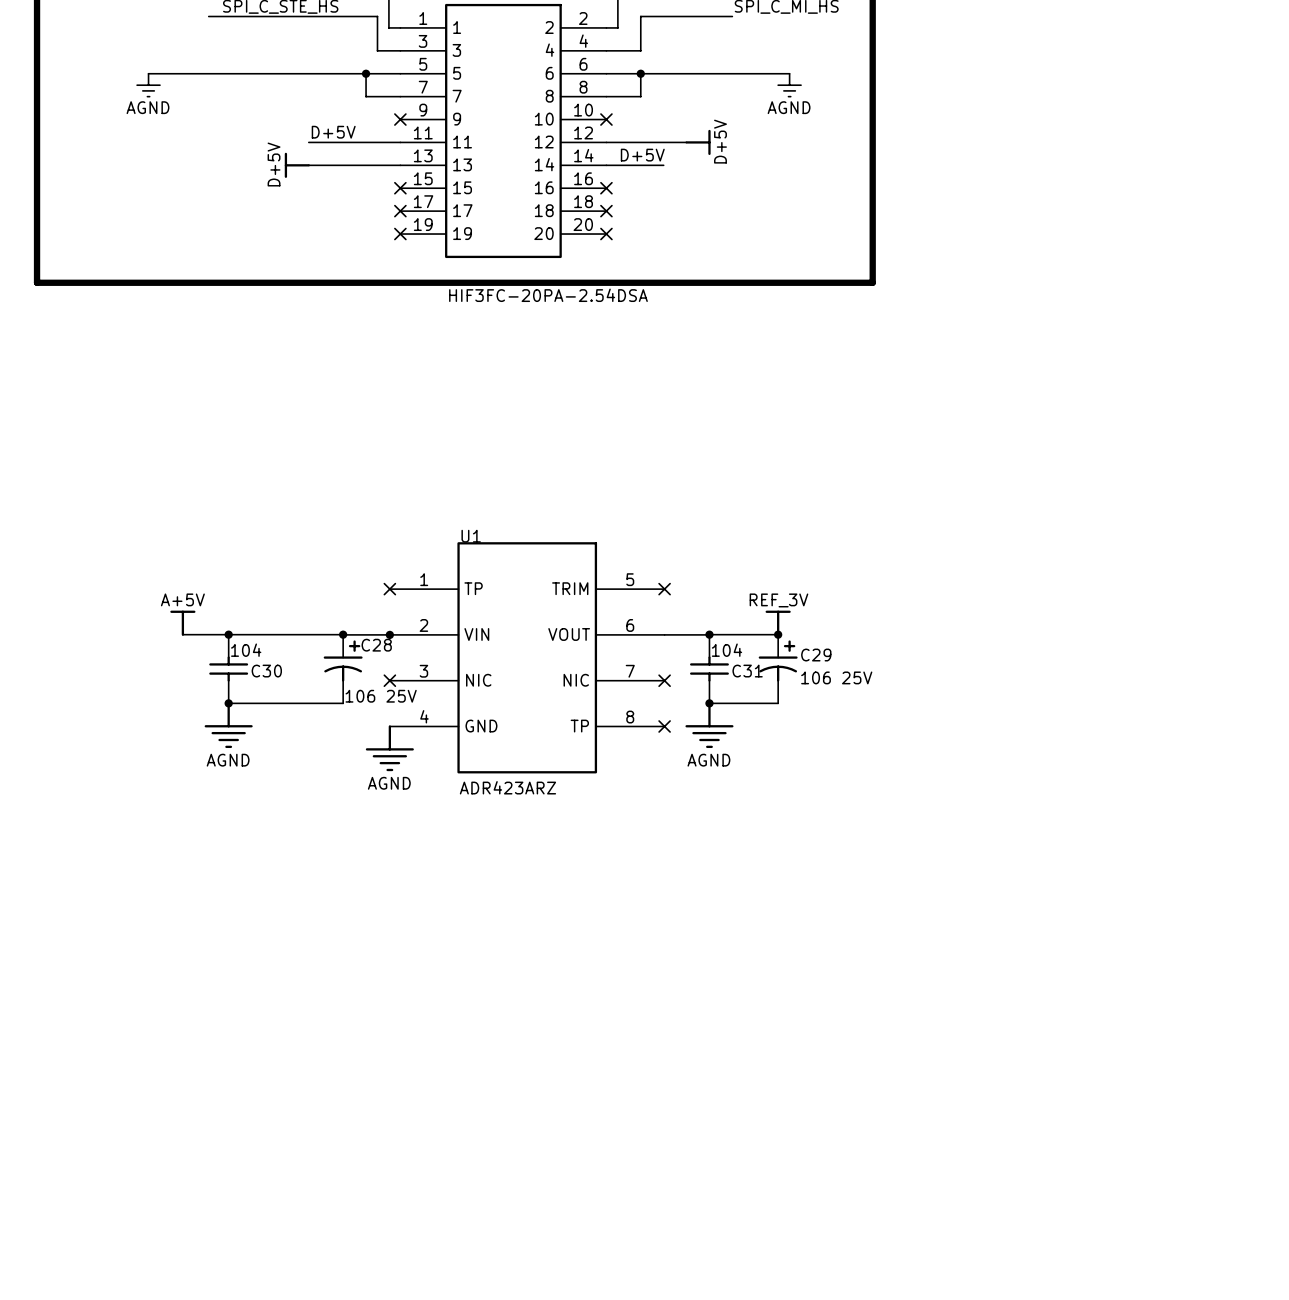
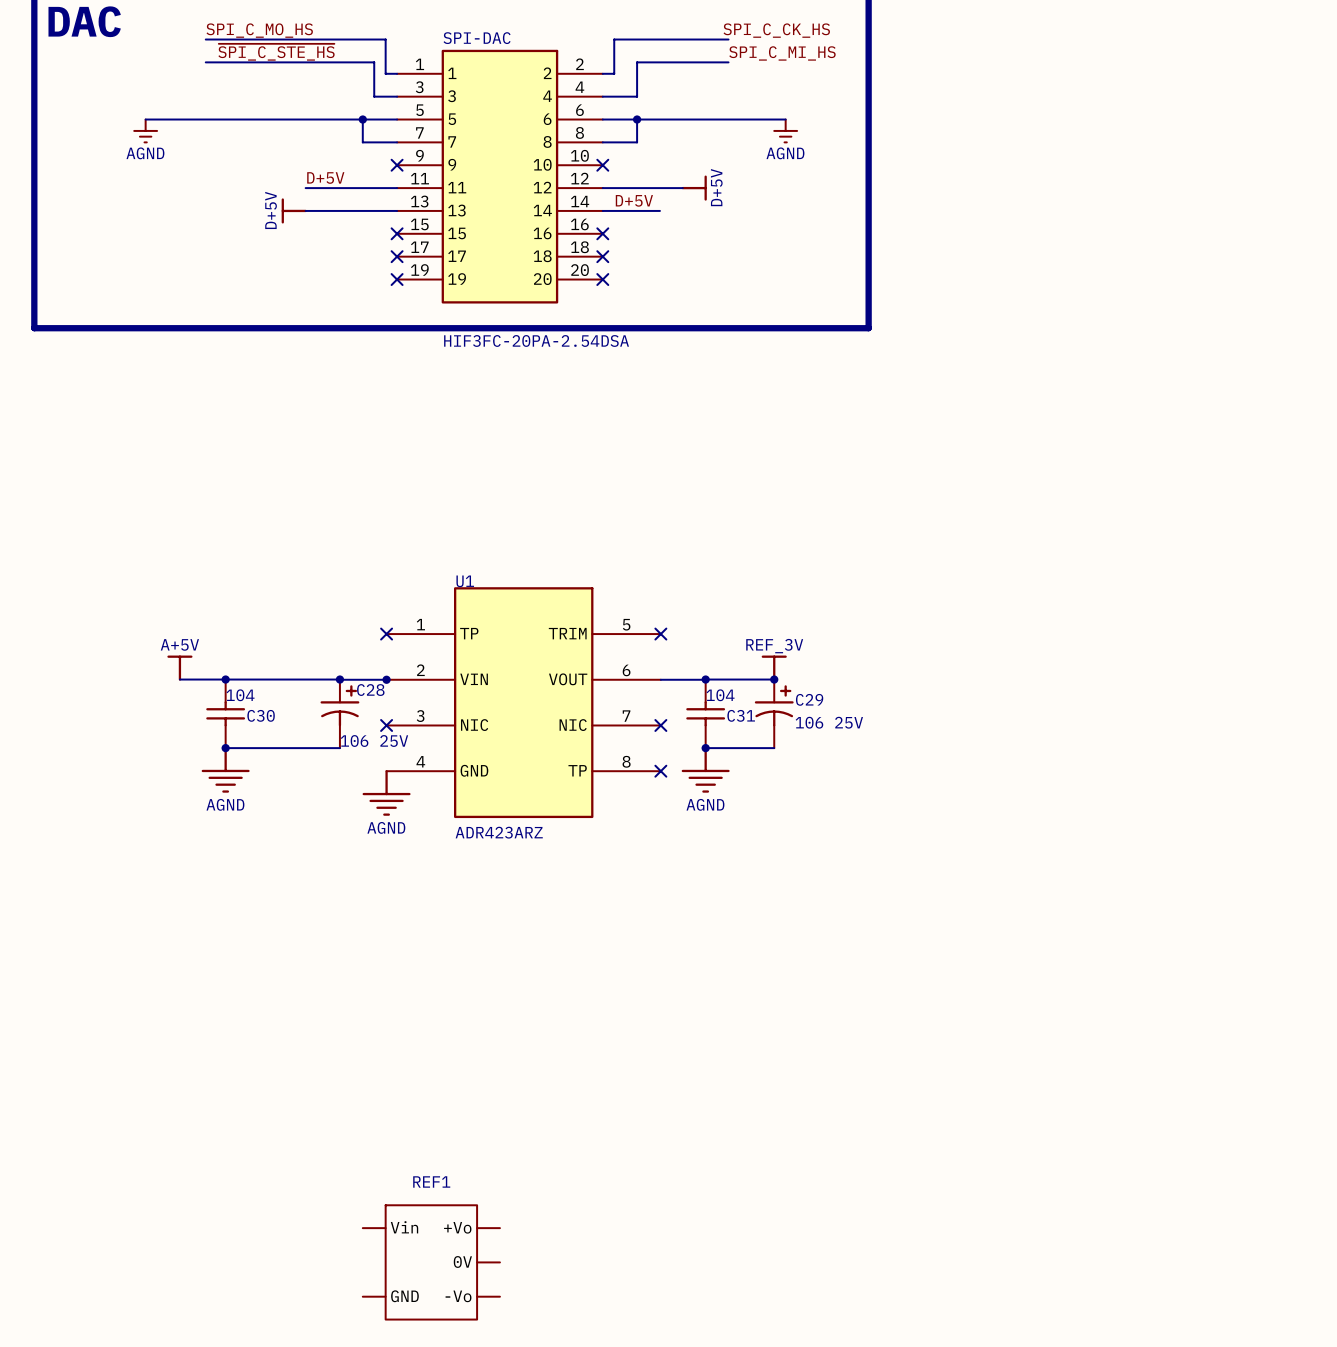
REF1: none -> (431, 1262)

